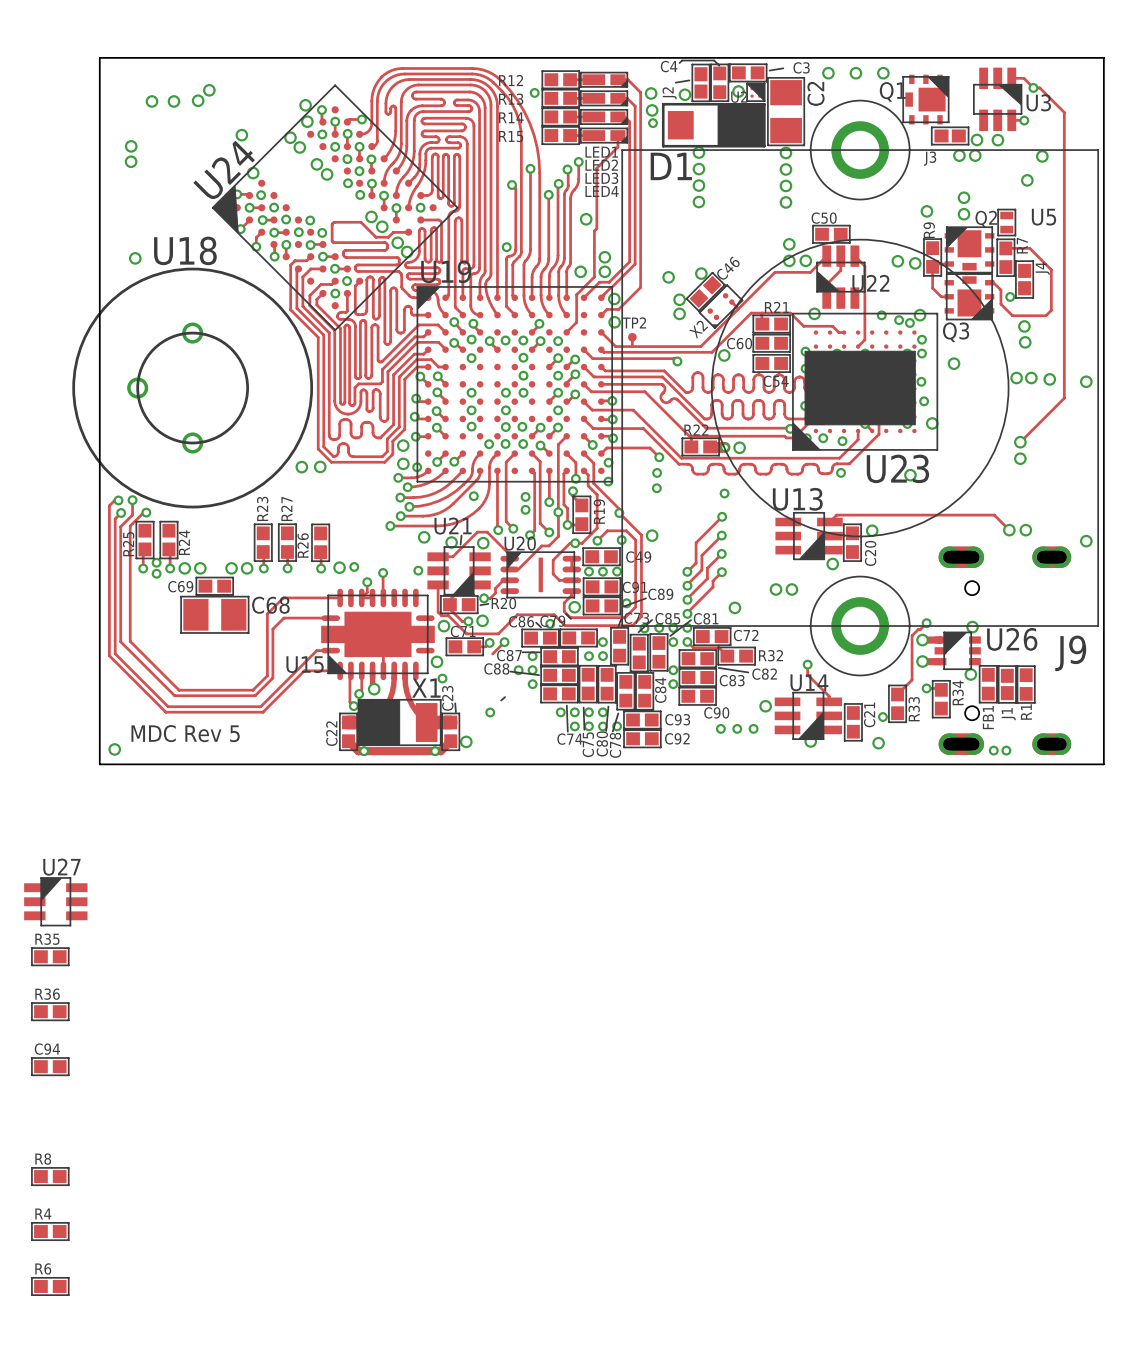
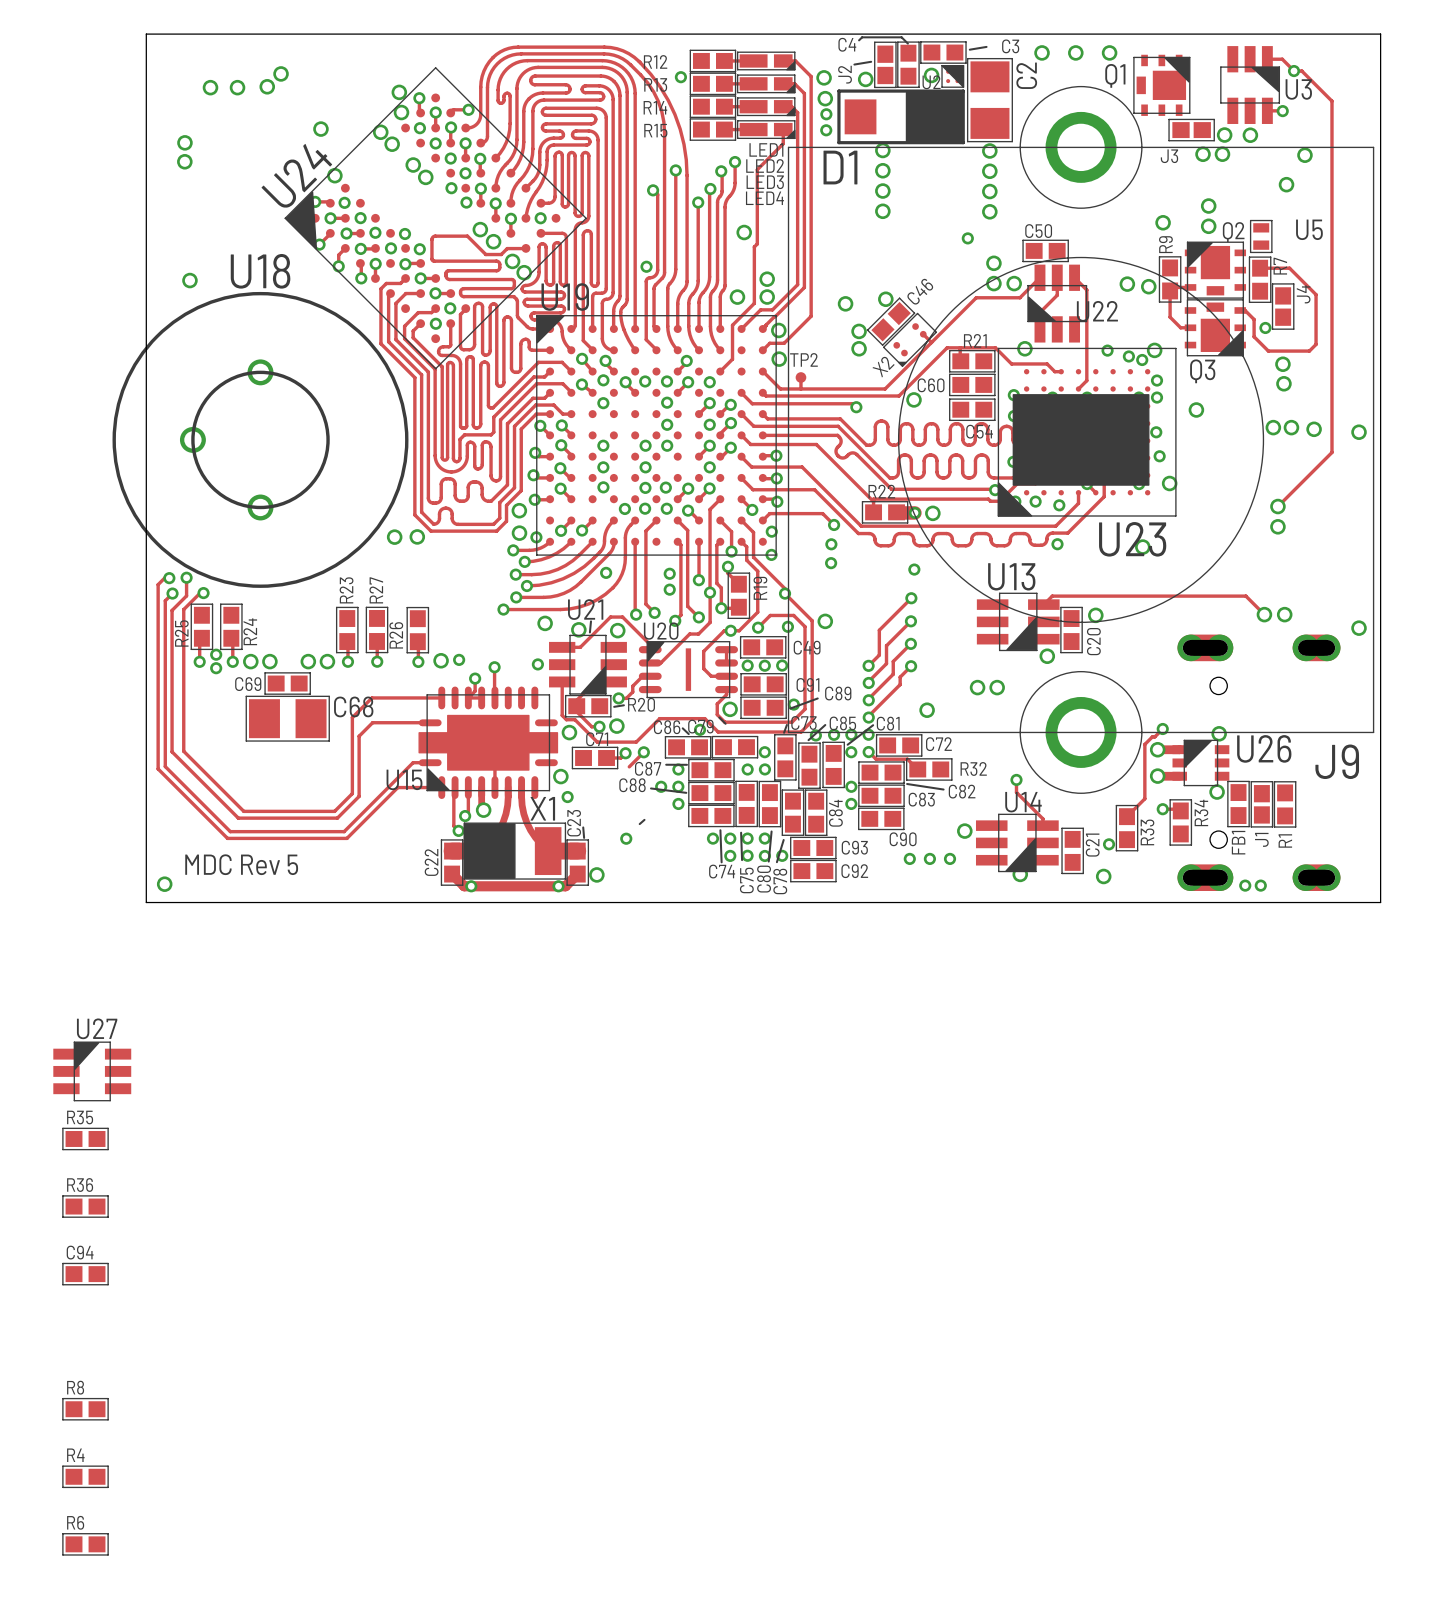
via: none -> (826, 130)
via: none -> (967, 238)

